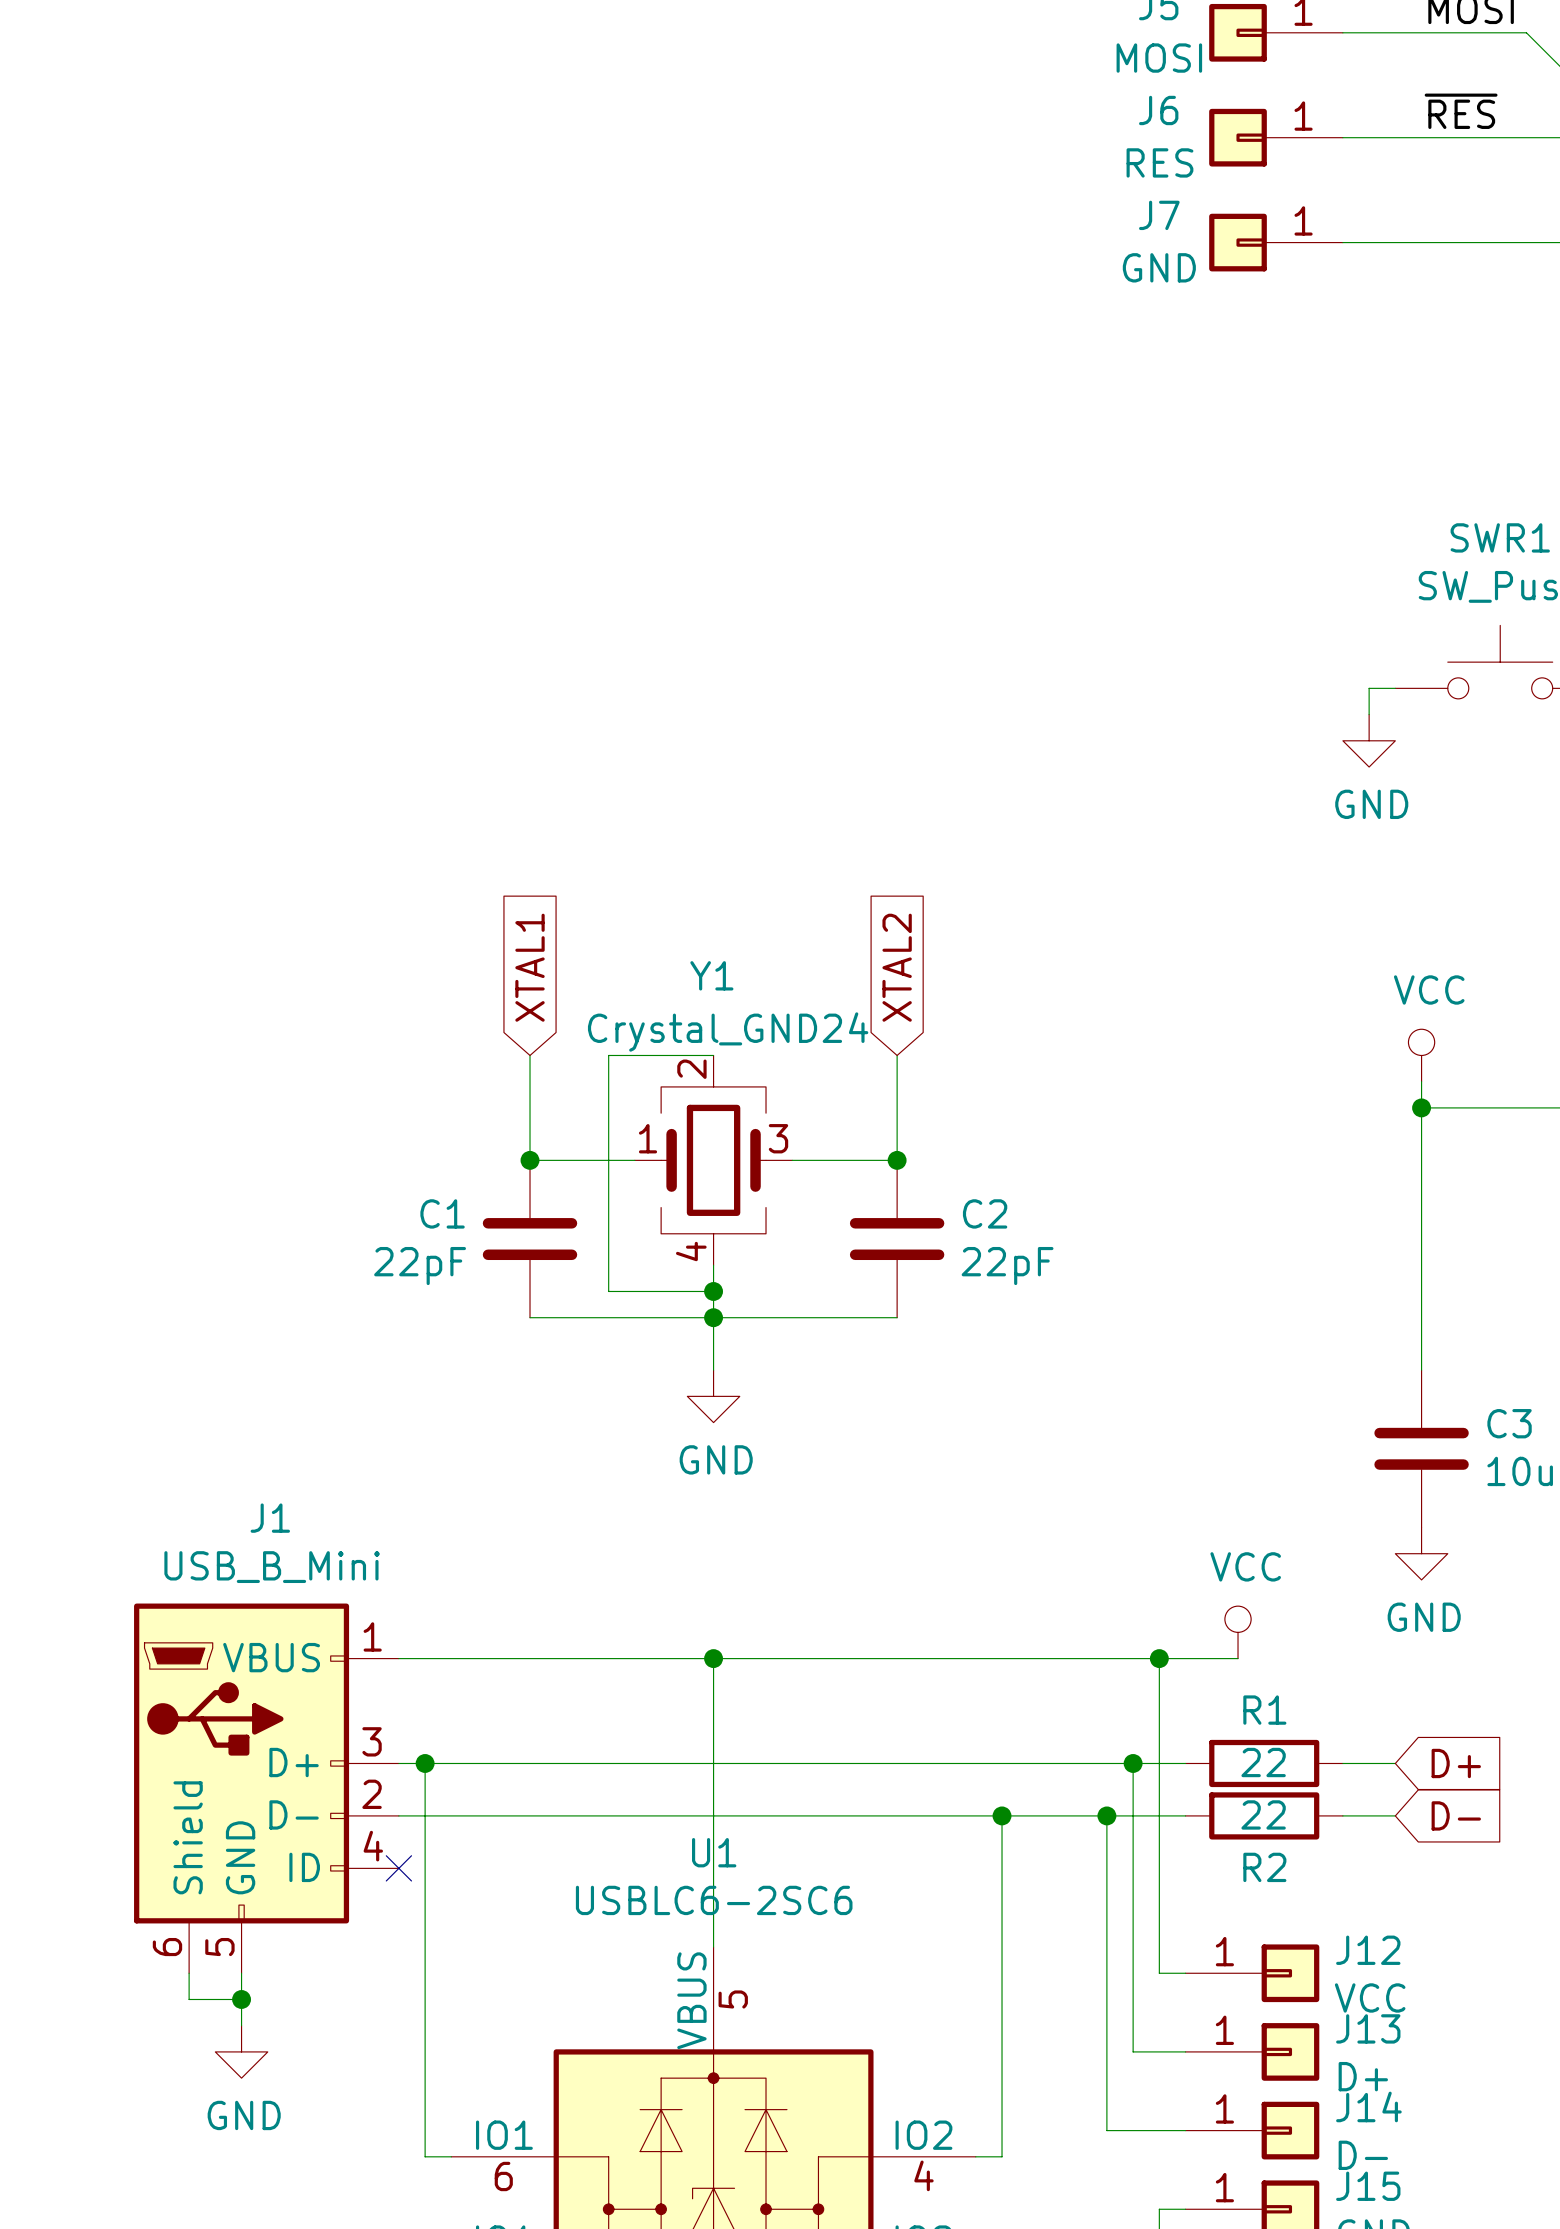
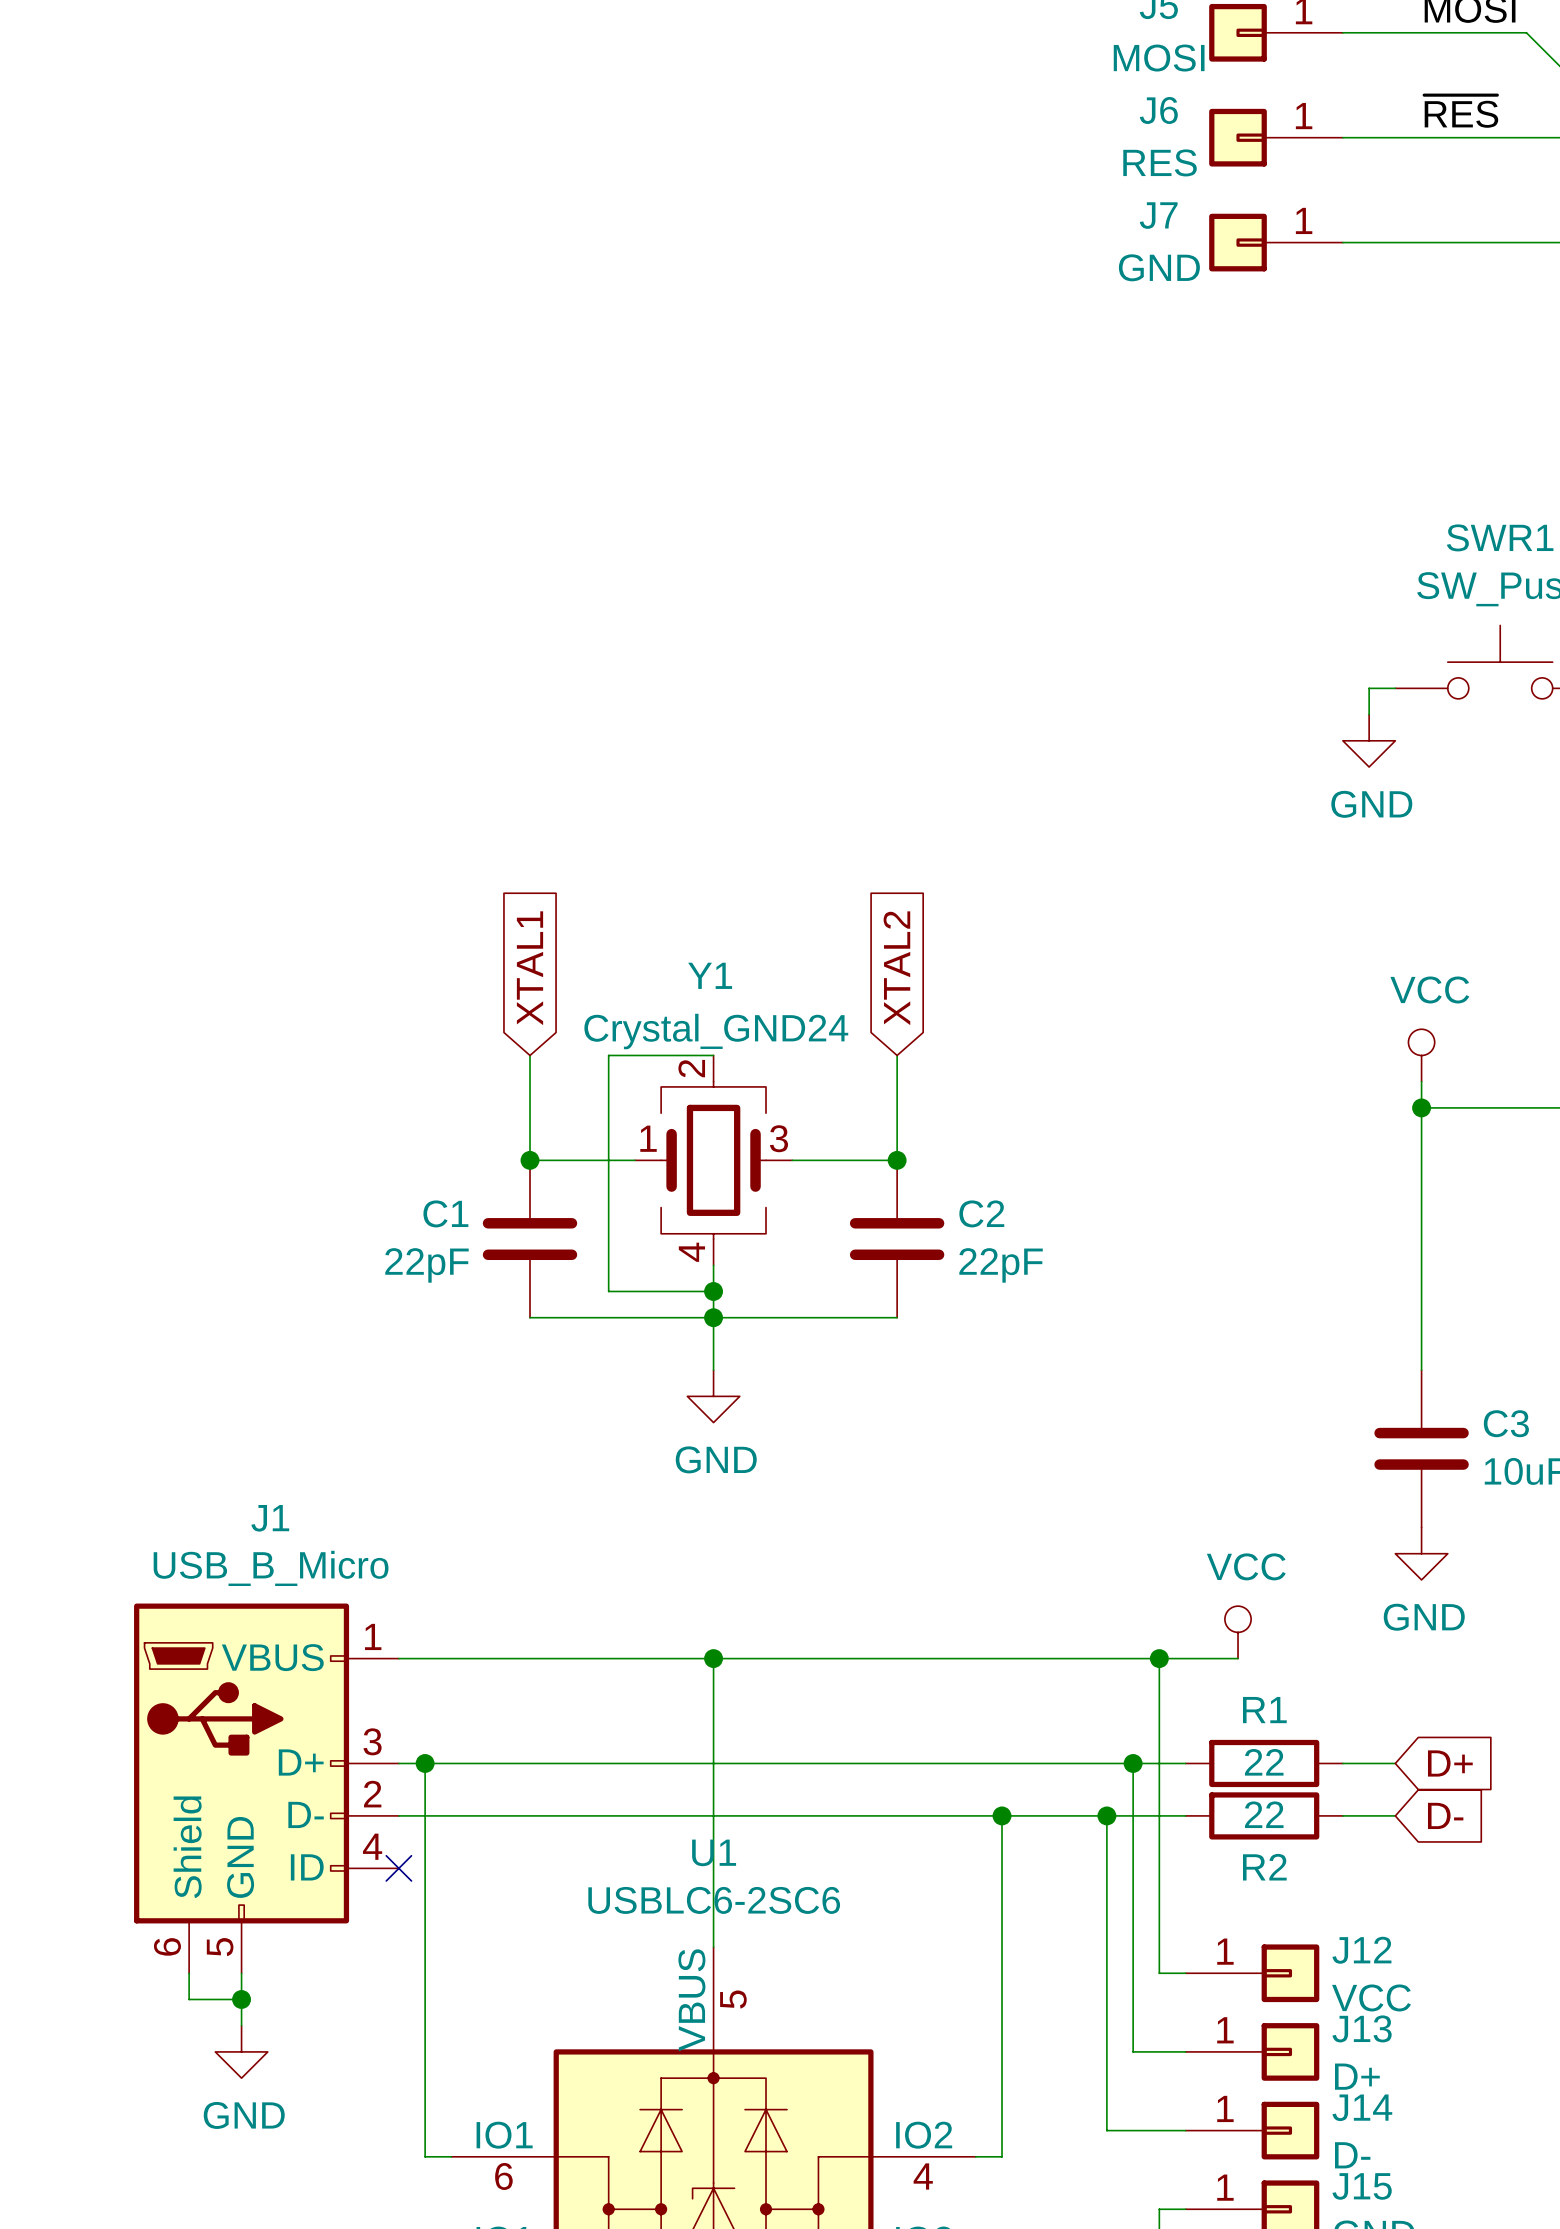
J1 value: USB_B_Mini (272, 1567) -> USB_B_Micro (271, 1568)

